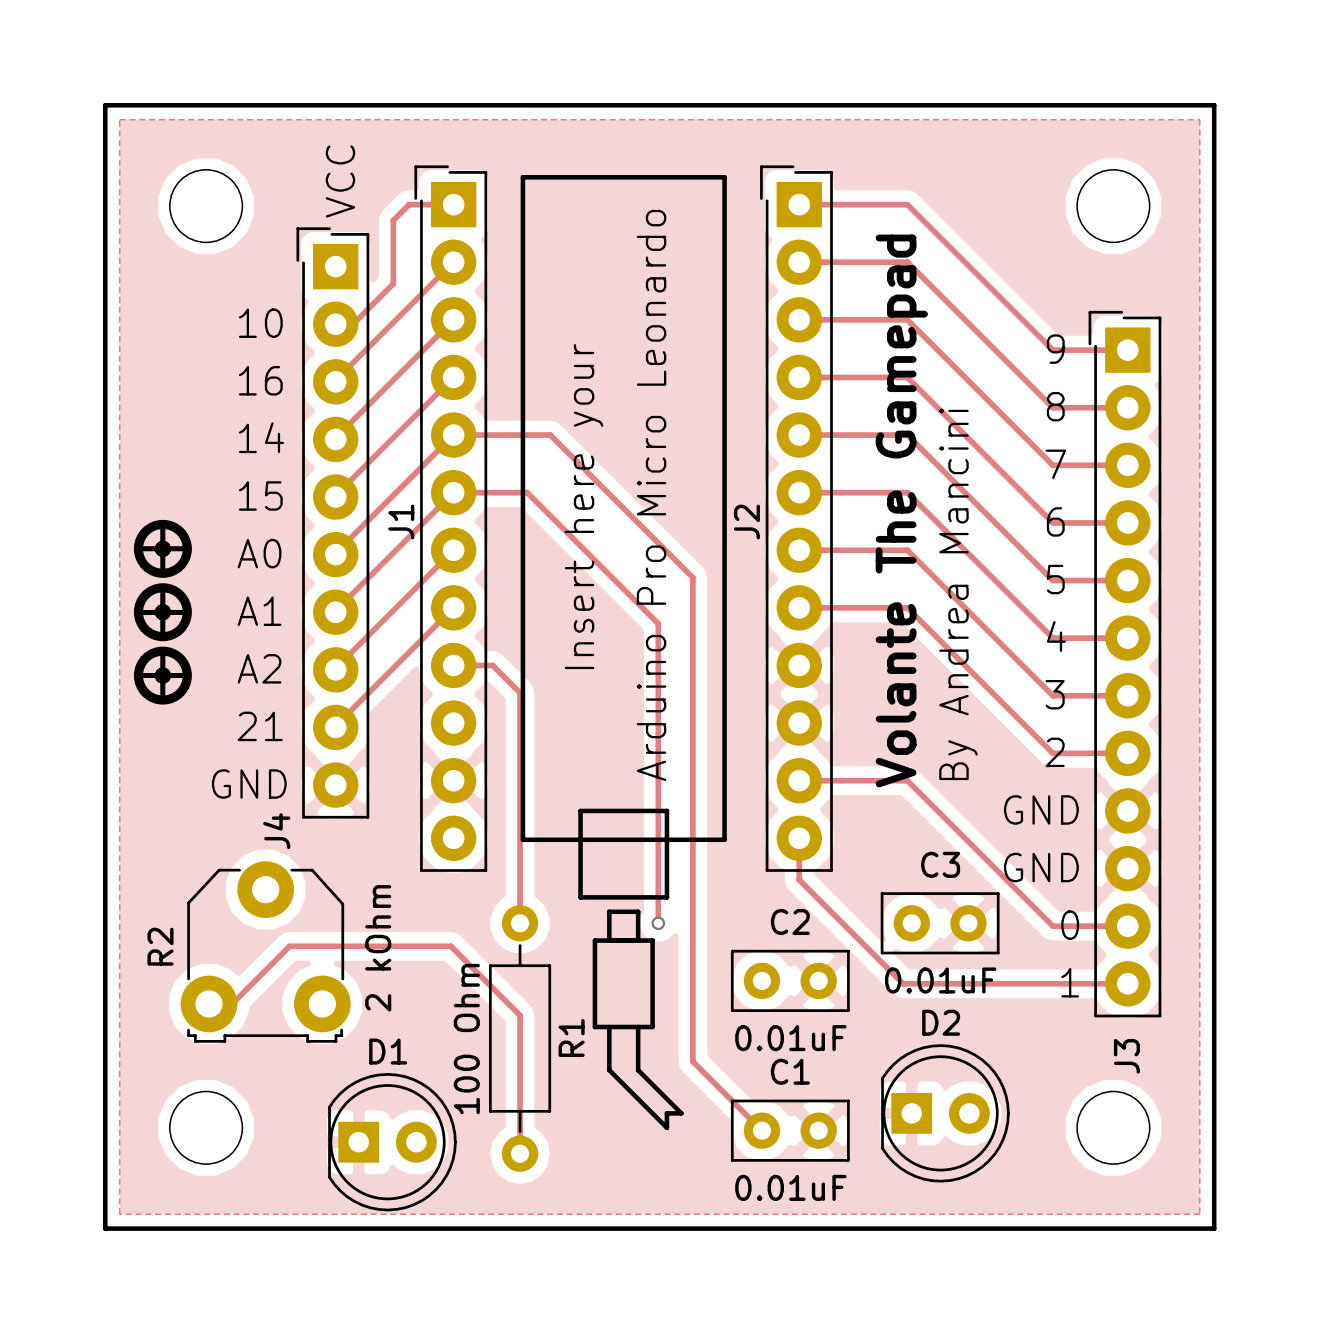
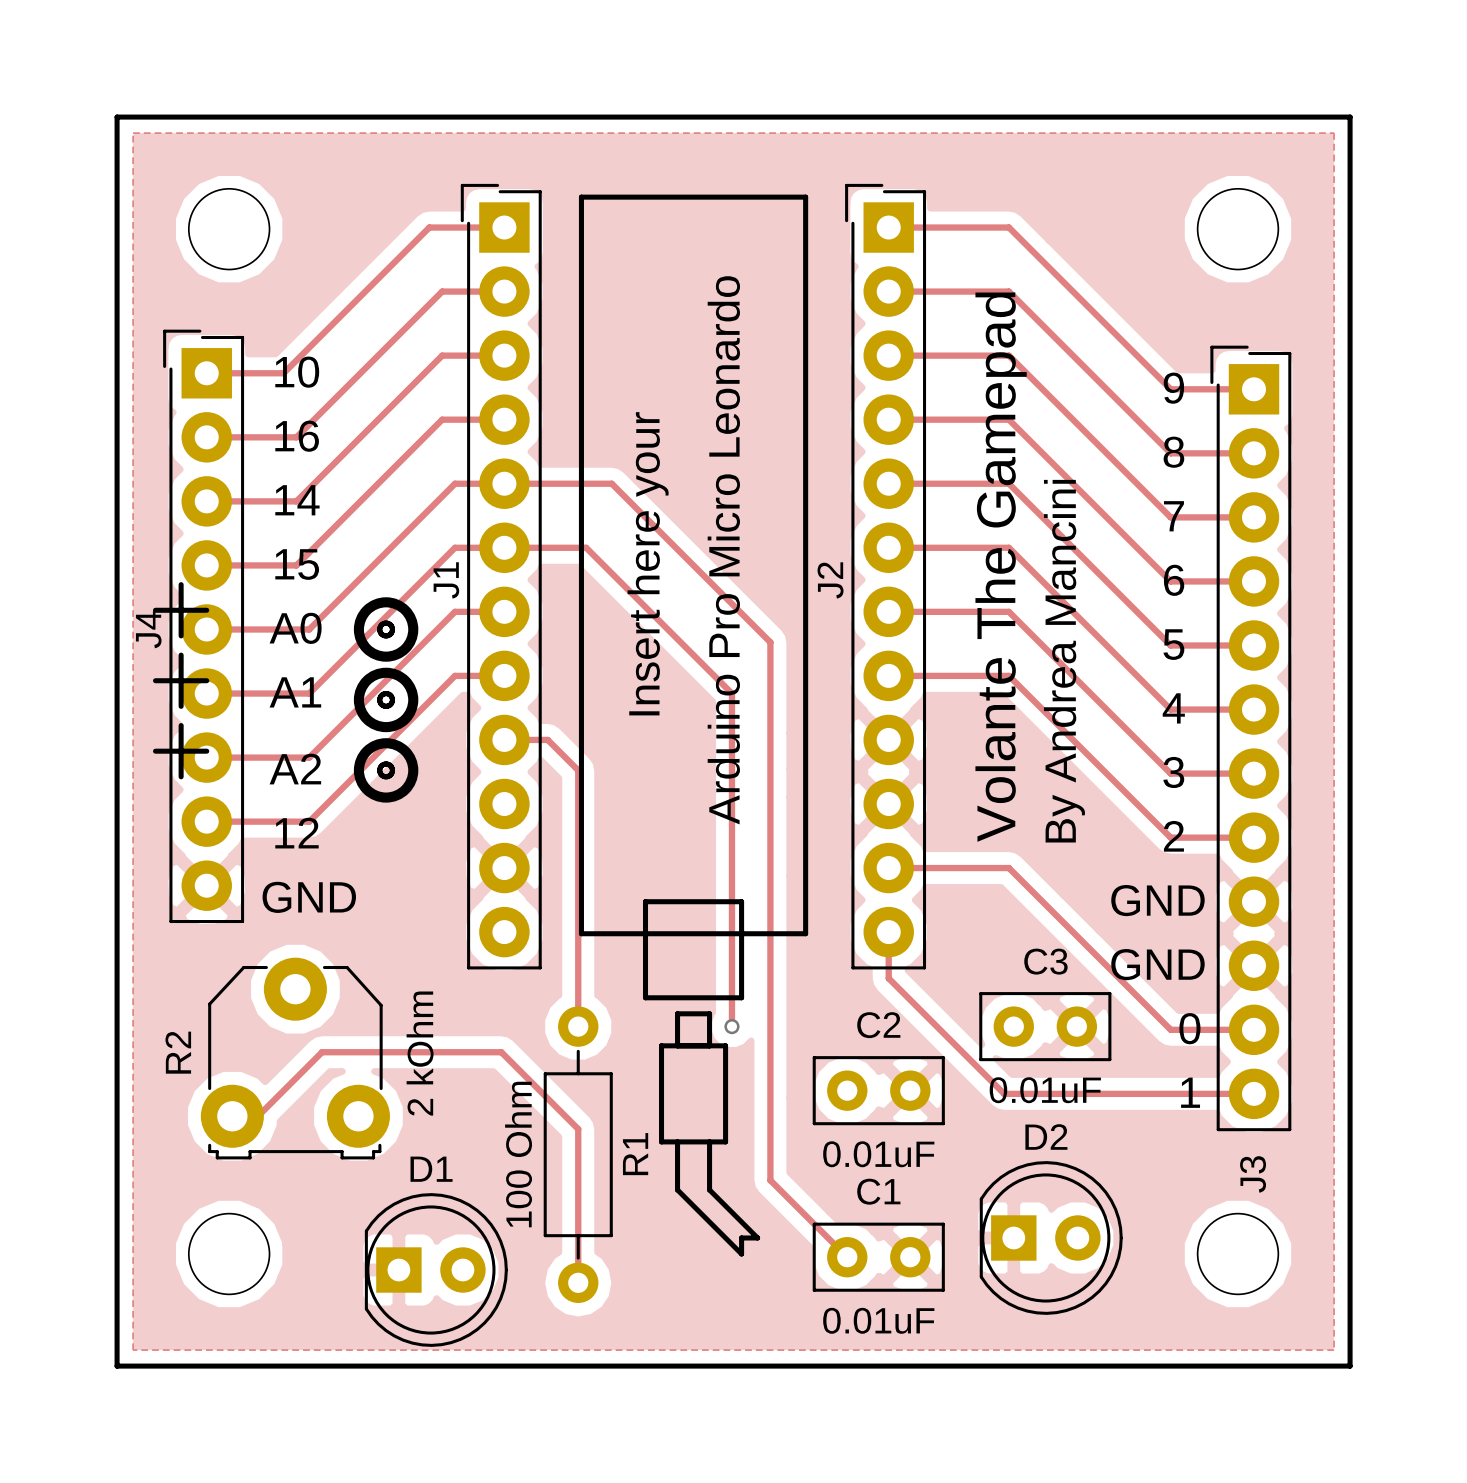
text: VCC (340, 181) -> none
track: (409, 204) (393, 220) (393, 283) (353, 324) (335, 324) -> (454, 227) (429, 227) (283, 373) (206, 373)
J4 footprint: [296, 227, 370, 819] -> [163, 329, 245, 924]
track: (453, 262) (335, 381) -> (504, 291) (442, 291) (296, 437) (206, 437)
track: (453, 319) (335, 439) -> (504, 355) (442, 355) (296, 501) (206, 501)
text position: 10 (260, 323) -> 10 (297, 372)
track: (453, 377) (335, 497) -> (504, 419) (442, 419) (296, 565) (206, 565)
text position: 16 (260, 380) -> 16 (297, 436)
track: (453, 435) (335, 554) -> (504, 483) (454, 483) (309, 629) (206, 629)
text position: 14 (261, 437) -> 14 (297, 500)
track: (453, 492) (335, 612) -> (504, 547) (454, 547) (309, 693) (206, 693)
text position: 15 (260, 495) -> 15 (297, 564)
drawing: [133, 519, 192, 705] -> none
drawing: none -> [353, 597, 419, 803]
track: (453, 550) (335, 669) -> (504, 611) (454, 611) (309, 757) (206, 757)
text position: A0 (259, 553) -> A0 (295, 628)
track: (453, 607) (335, 727) -> (504, 675) (454, 675) (309, 821) (206, 821)
text position: A1 (259, 611) -> A1 (295, 692)
text position: A2 (259, 668) -> A2 (295, 769)
text: 21 (260, 726) -> none
text: none -> 12 (296, 833)
text position: GND (249, 784) -> GND (309, 897)
J4 name position: J4 (276, 831) -> J4 (148, 629)

